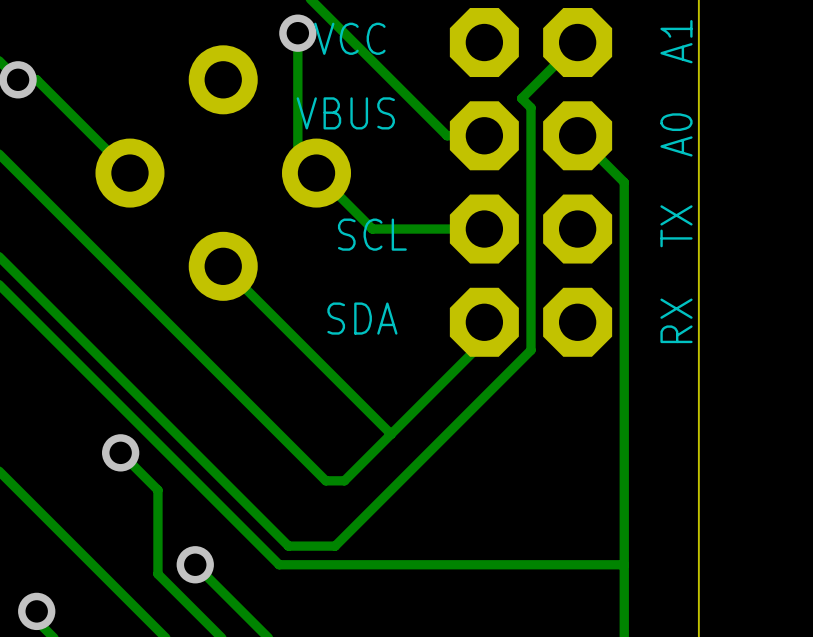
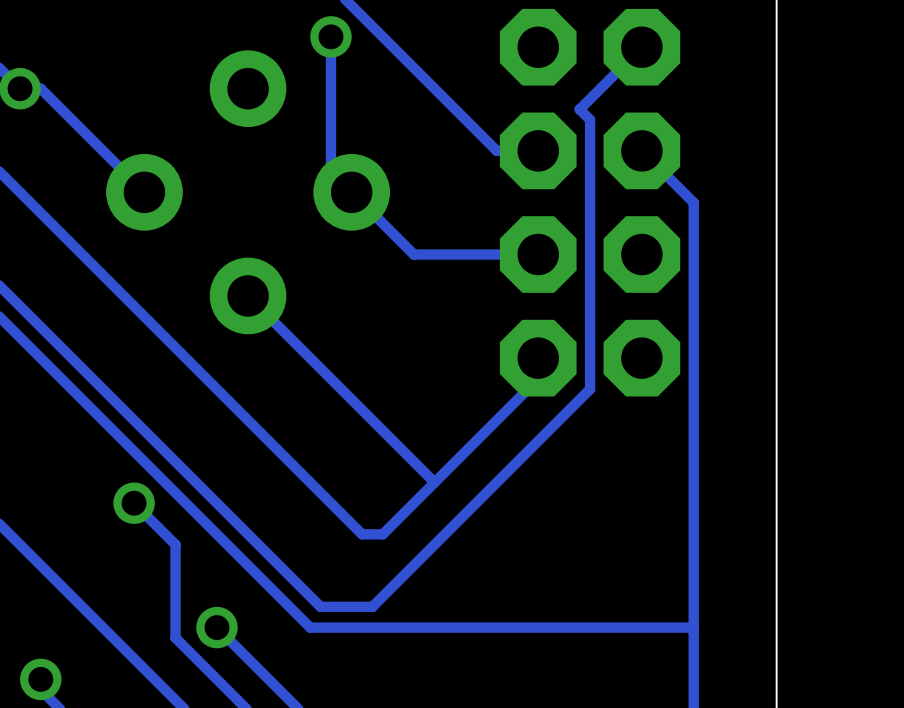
text: VCC (349, 38) -> none
text: A1 (676, 41) -> none
text: VBUS (345, 113) -> none
text: A0 (676, 134) -> none
text: TX (676, 226) -> none
text: SCL (372, 234) -> none
text: SDA (362, 318) -> none
text: RX (676, 320) -> none

